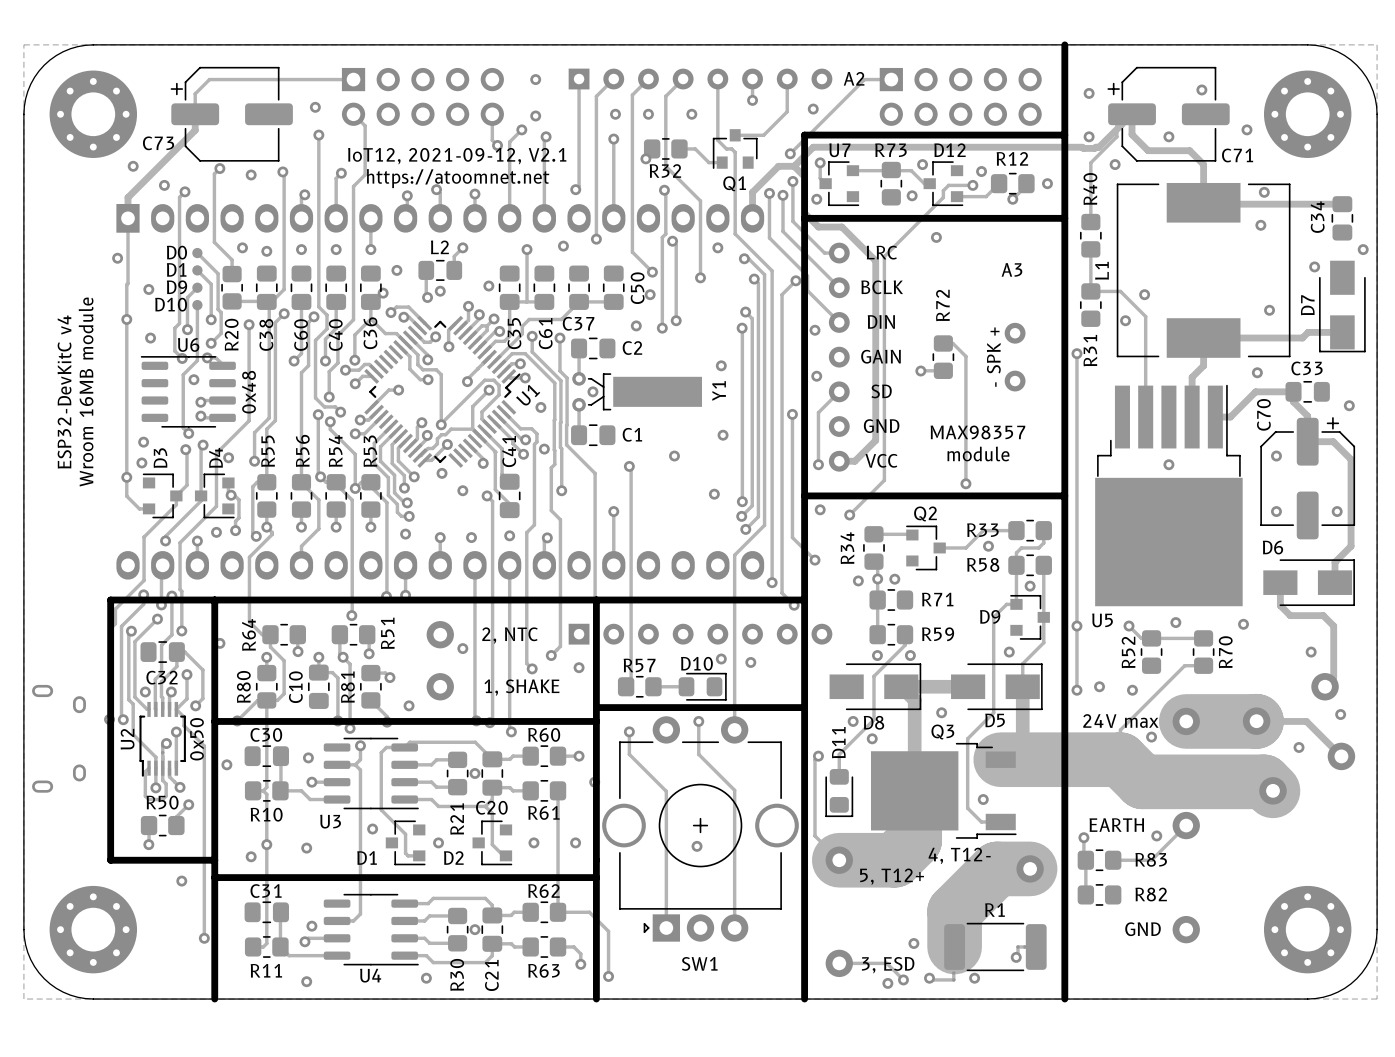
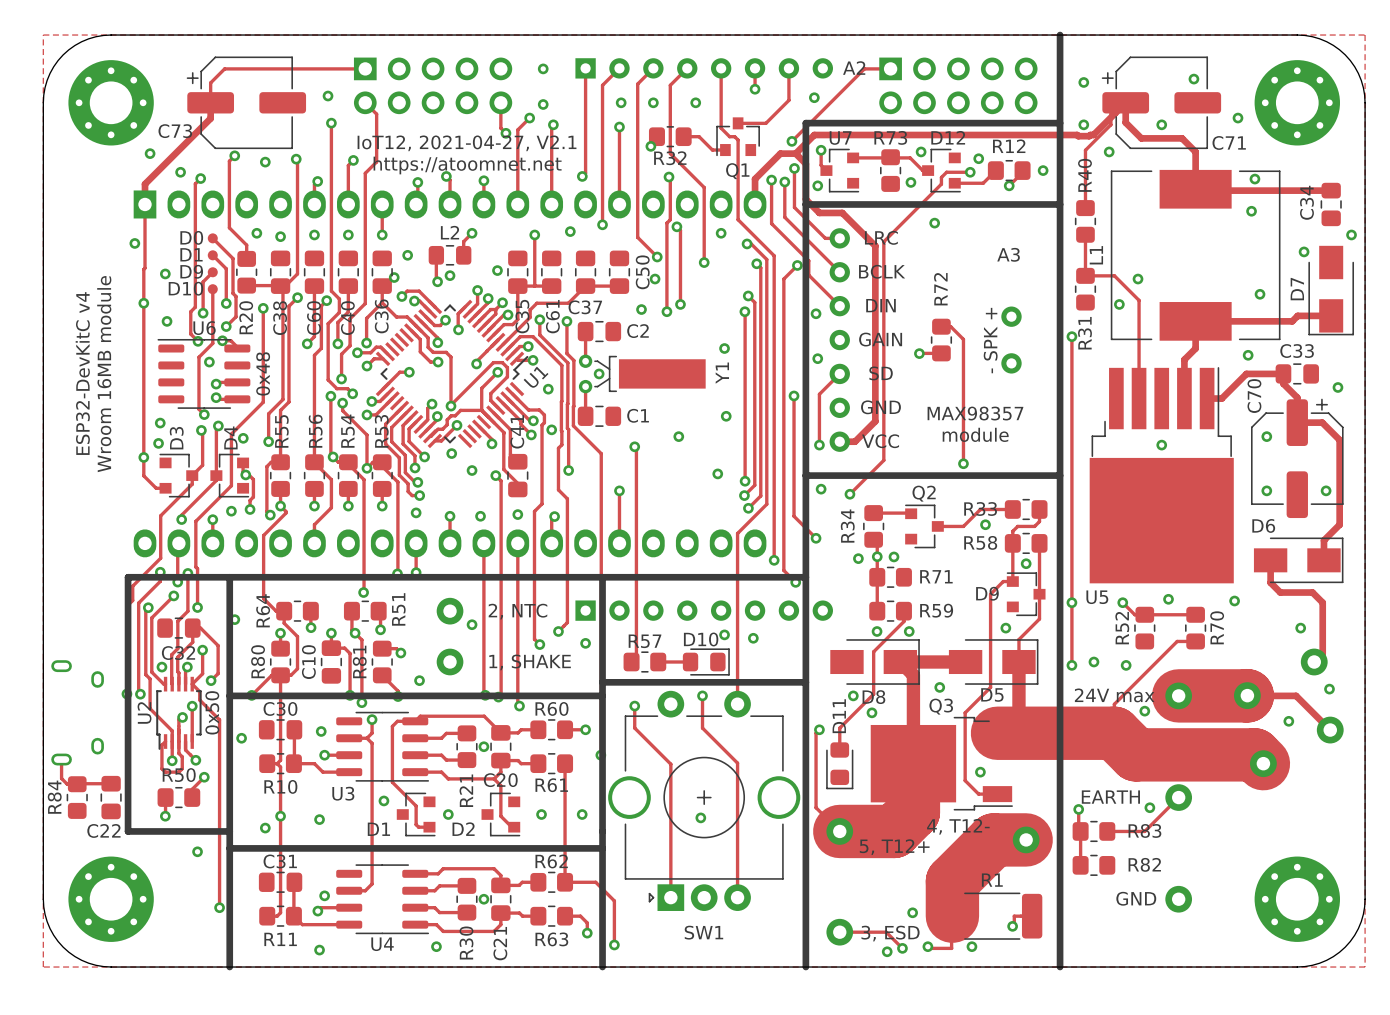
text: IoT12, 2021-09-12, V2.1 (457, 156) -> IoT12, 2021-04-27, V2.1 (467, 143)
track: none -> (61, 759) (61, 778) (67, 784) (111, 783)
R84: none -> (77, 797)
C22: none -> (111, 797)

